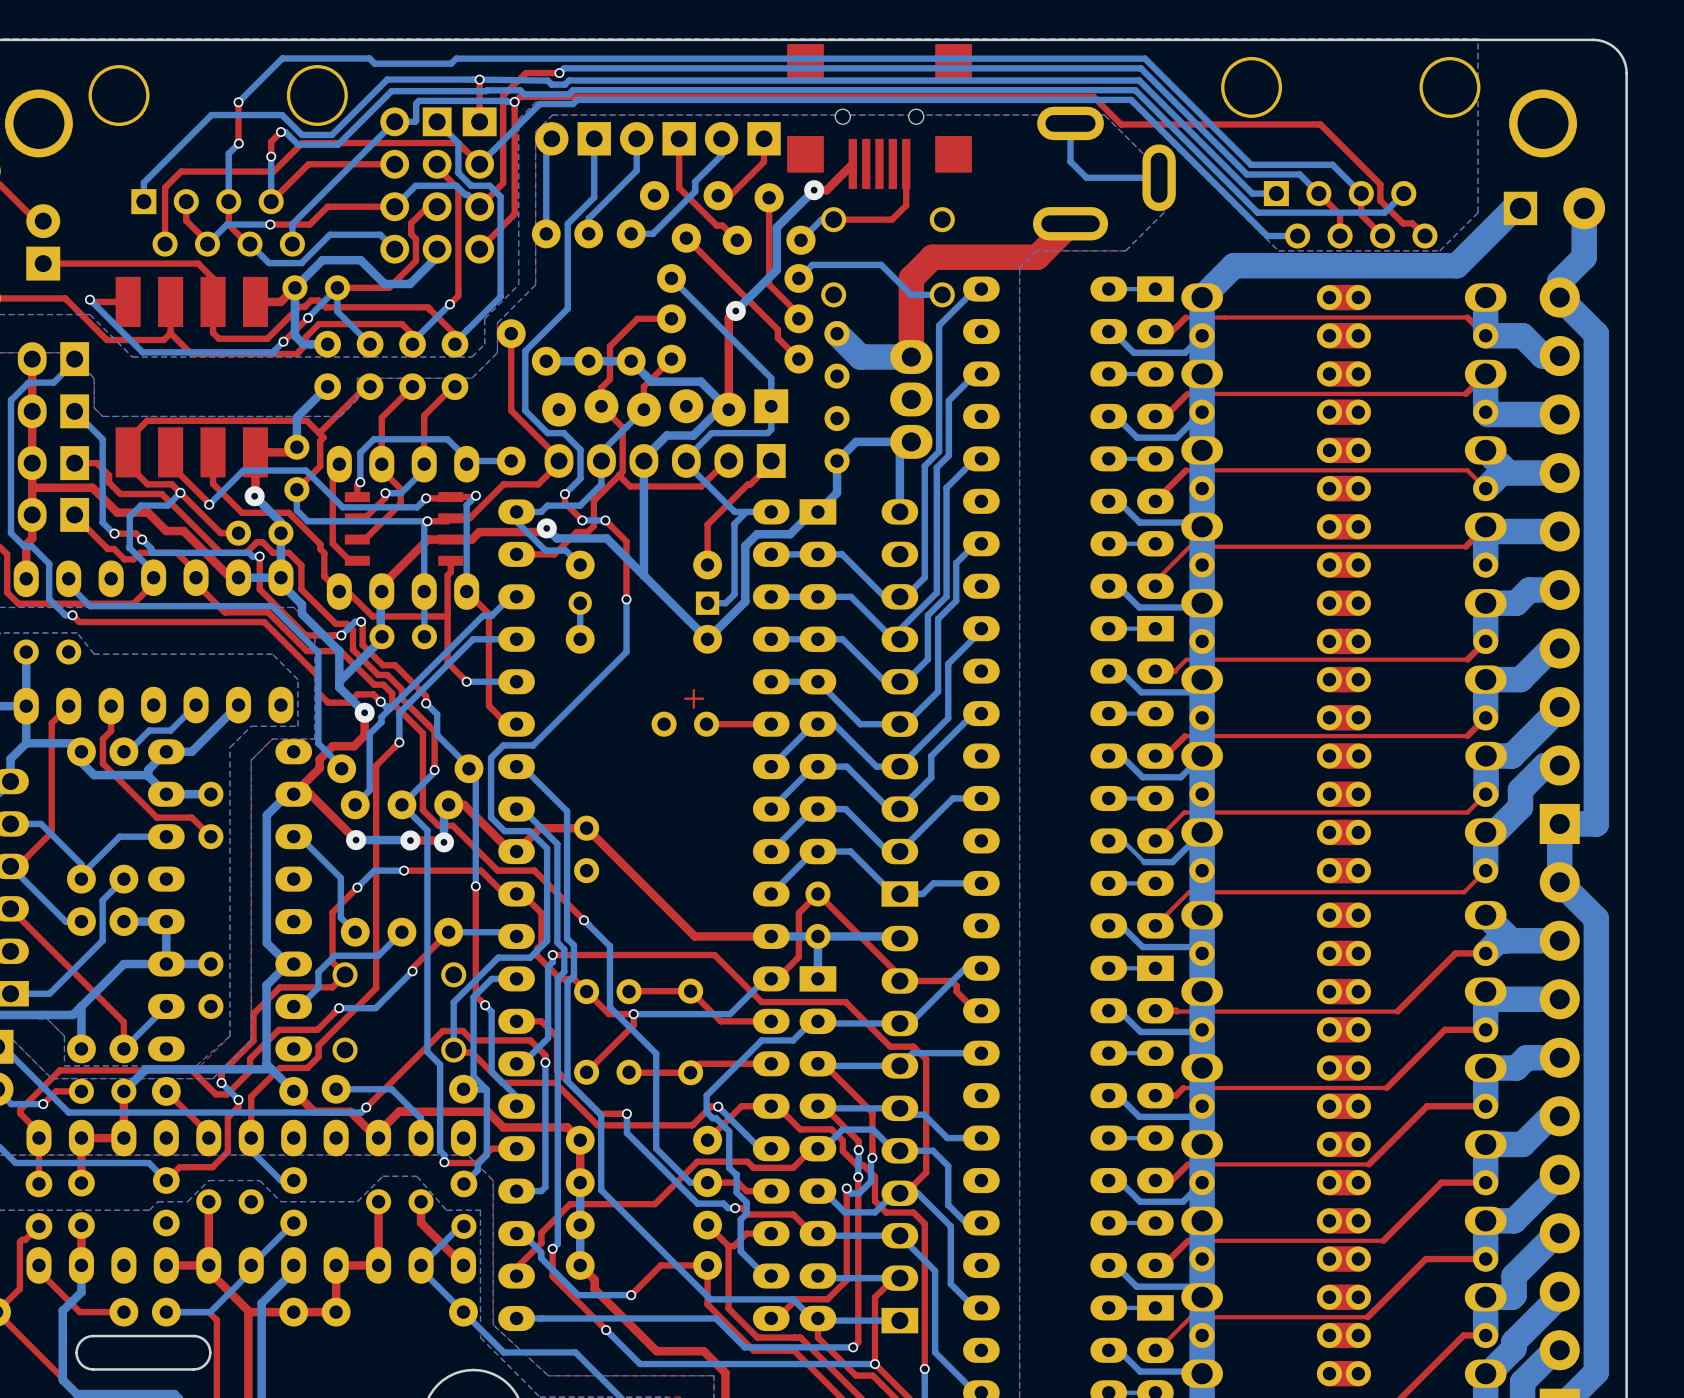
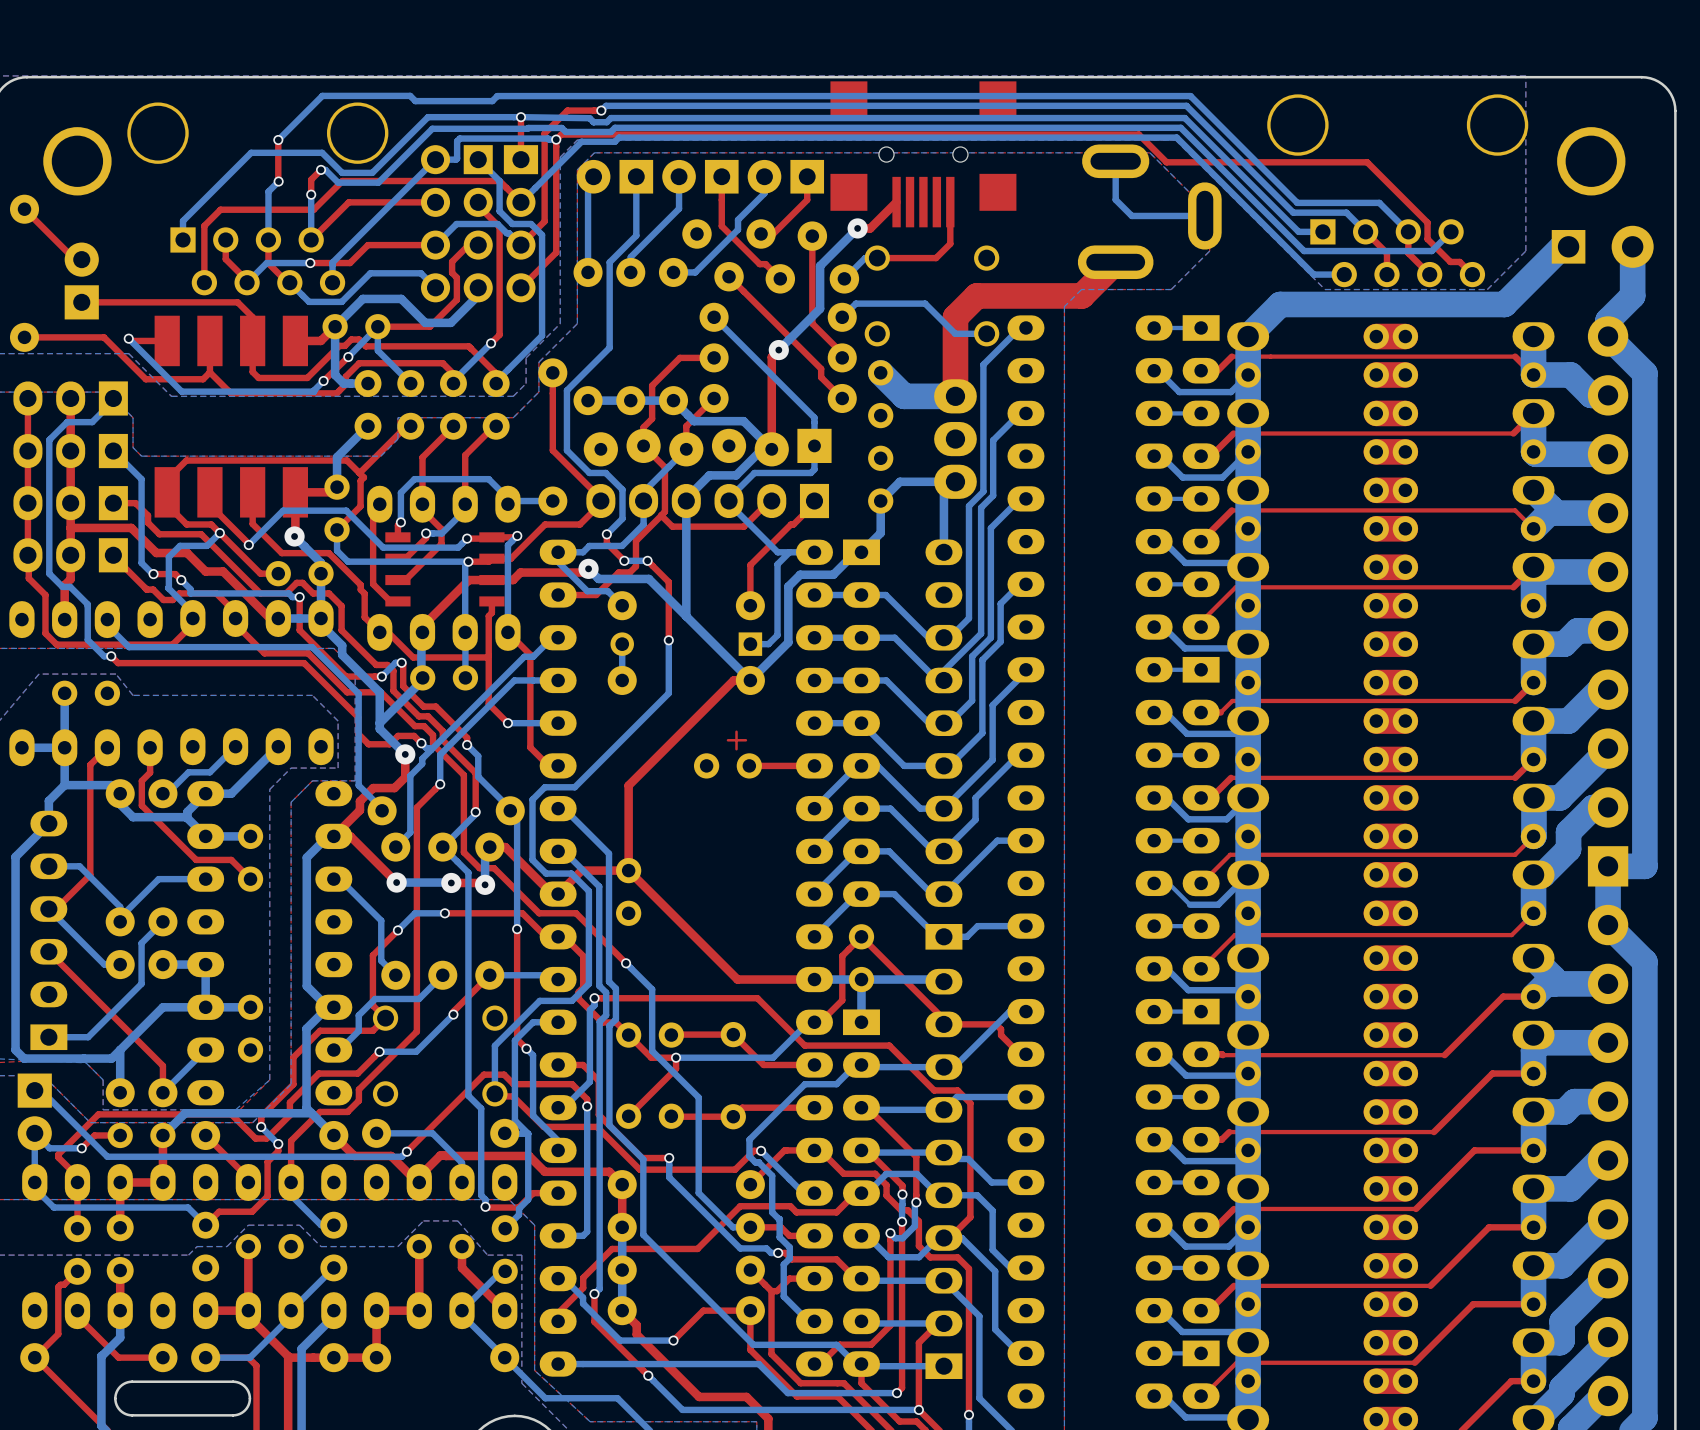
top track: none -> (750, 680) (733, 680) (628, 785) (628, 870)

